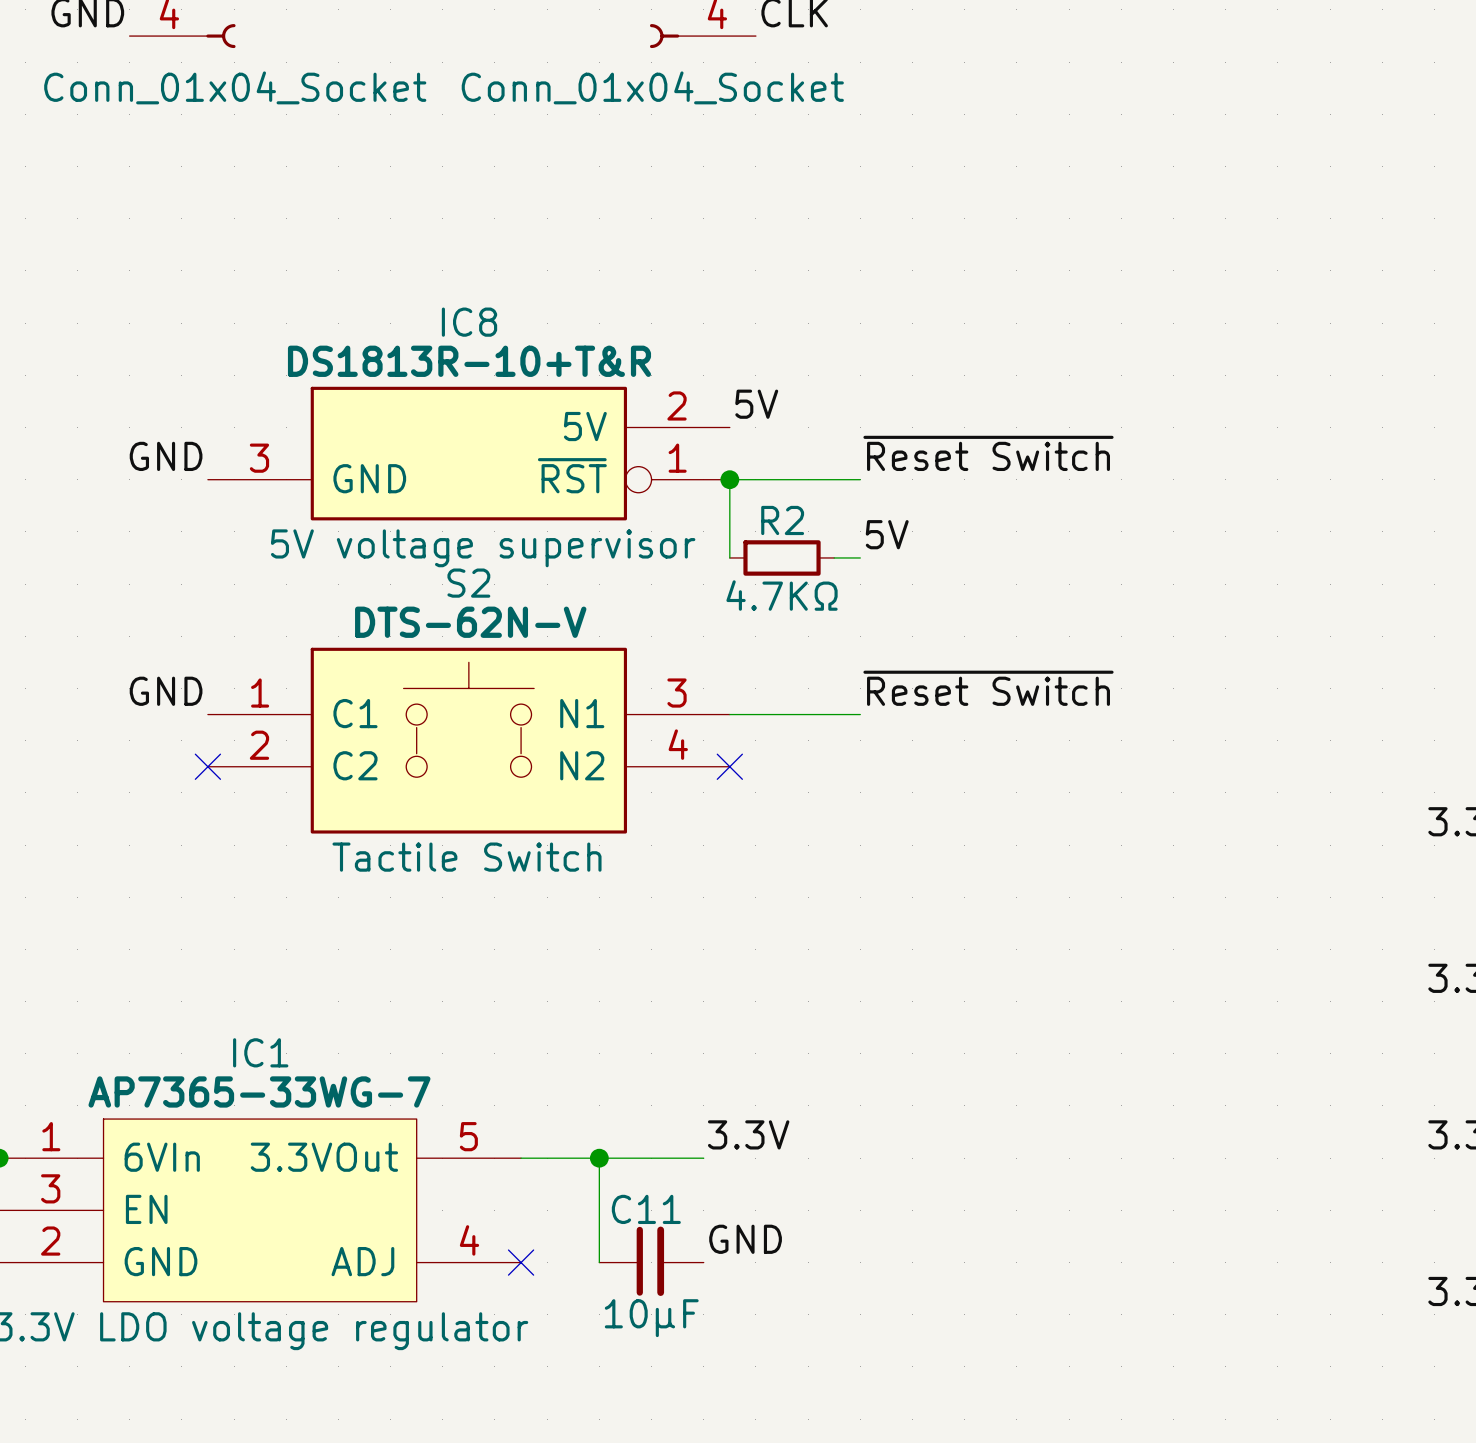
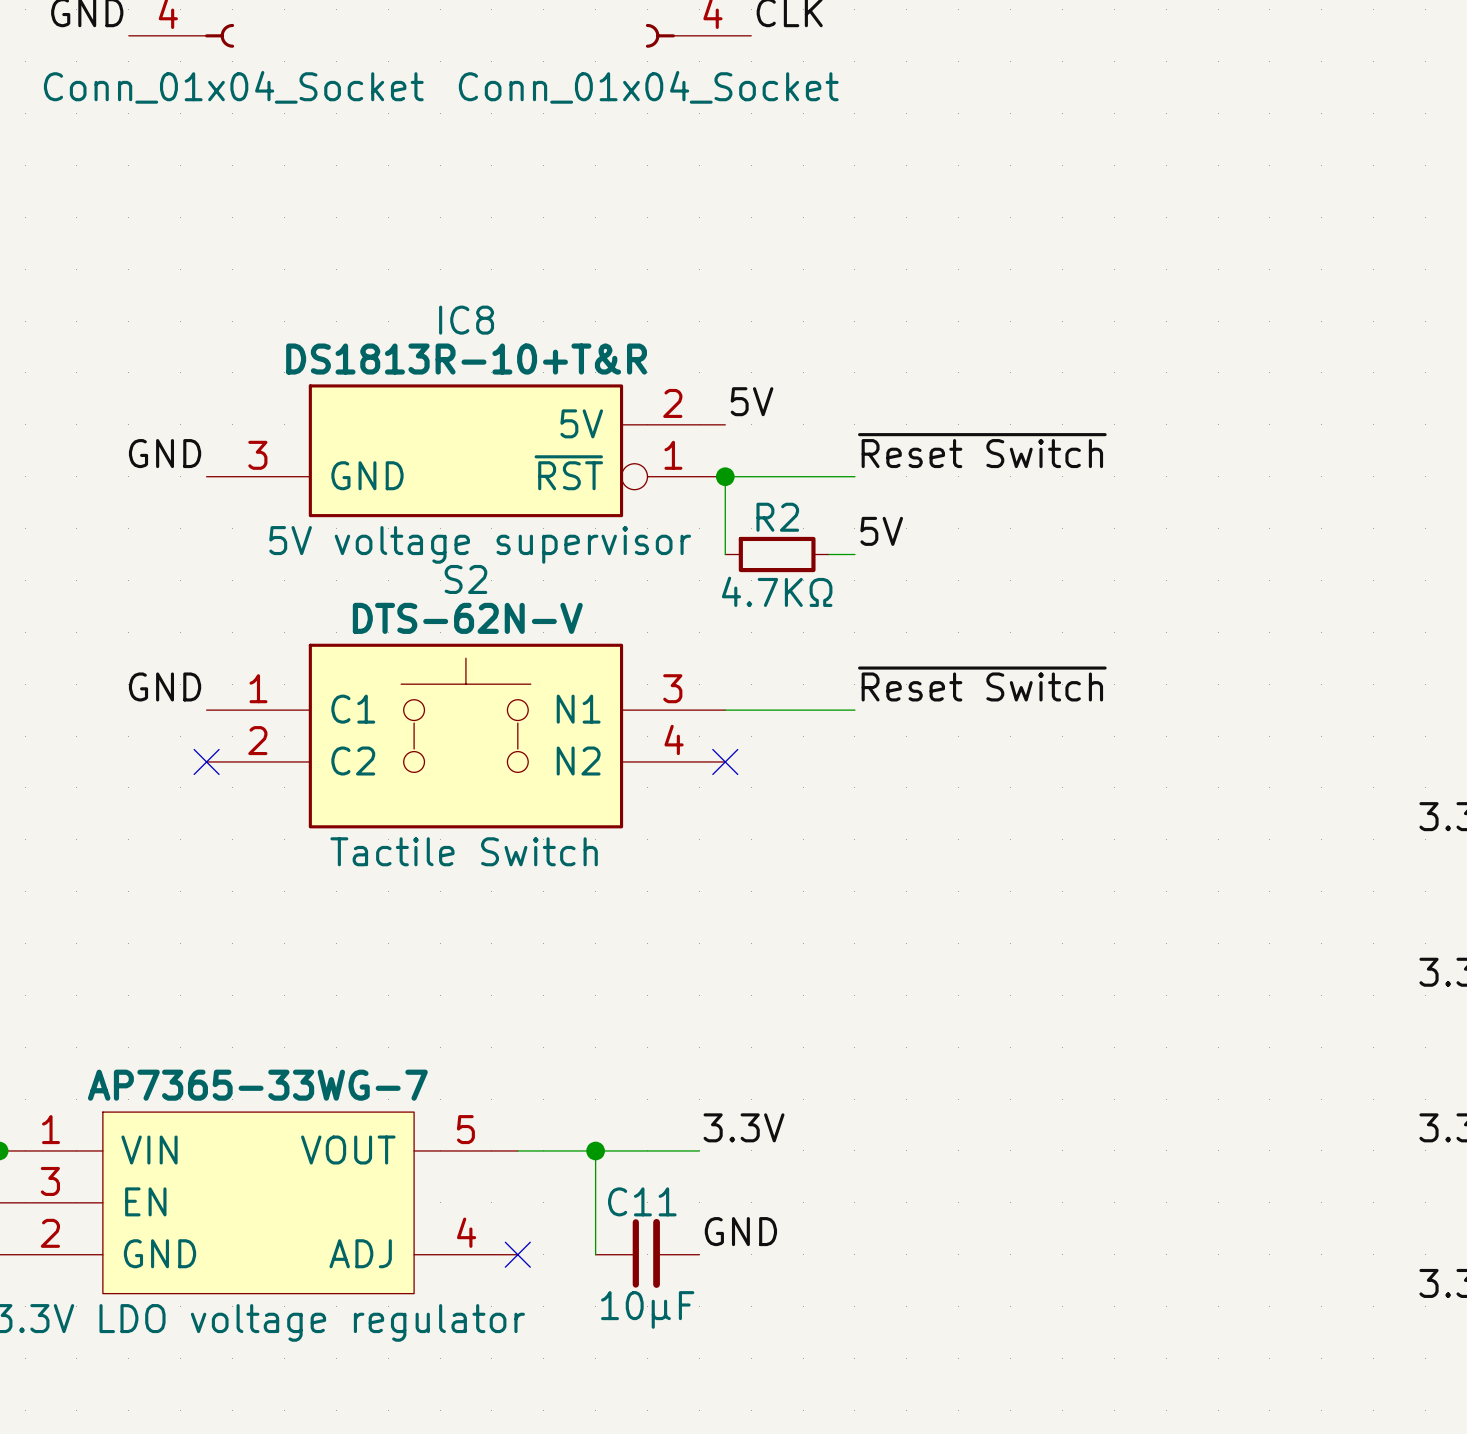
IC1 name: IC1 (260, 1052) -> none
IC1 pin name: 6VIn (162, 1157) -> VIN (149, 1150)
IC1 pin name: 3.3VOut (324, 1157) -> VOUT (348, 1150)

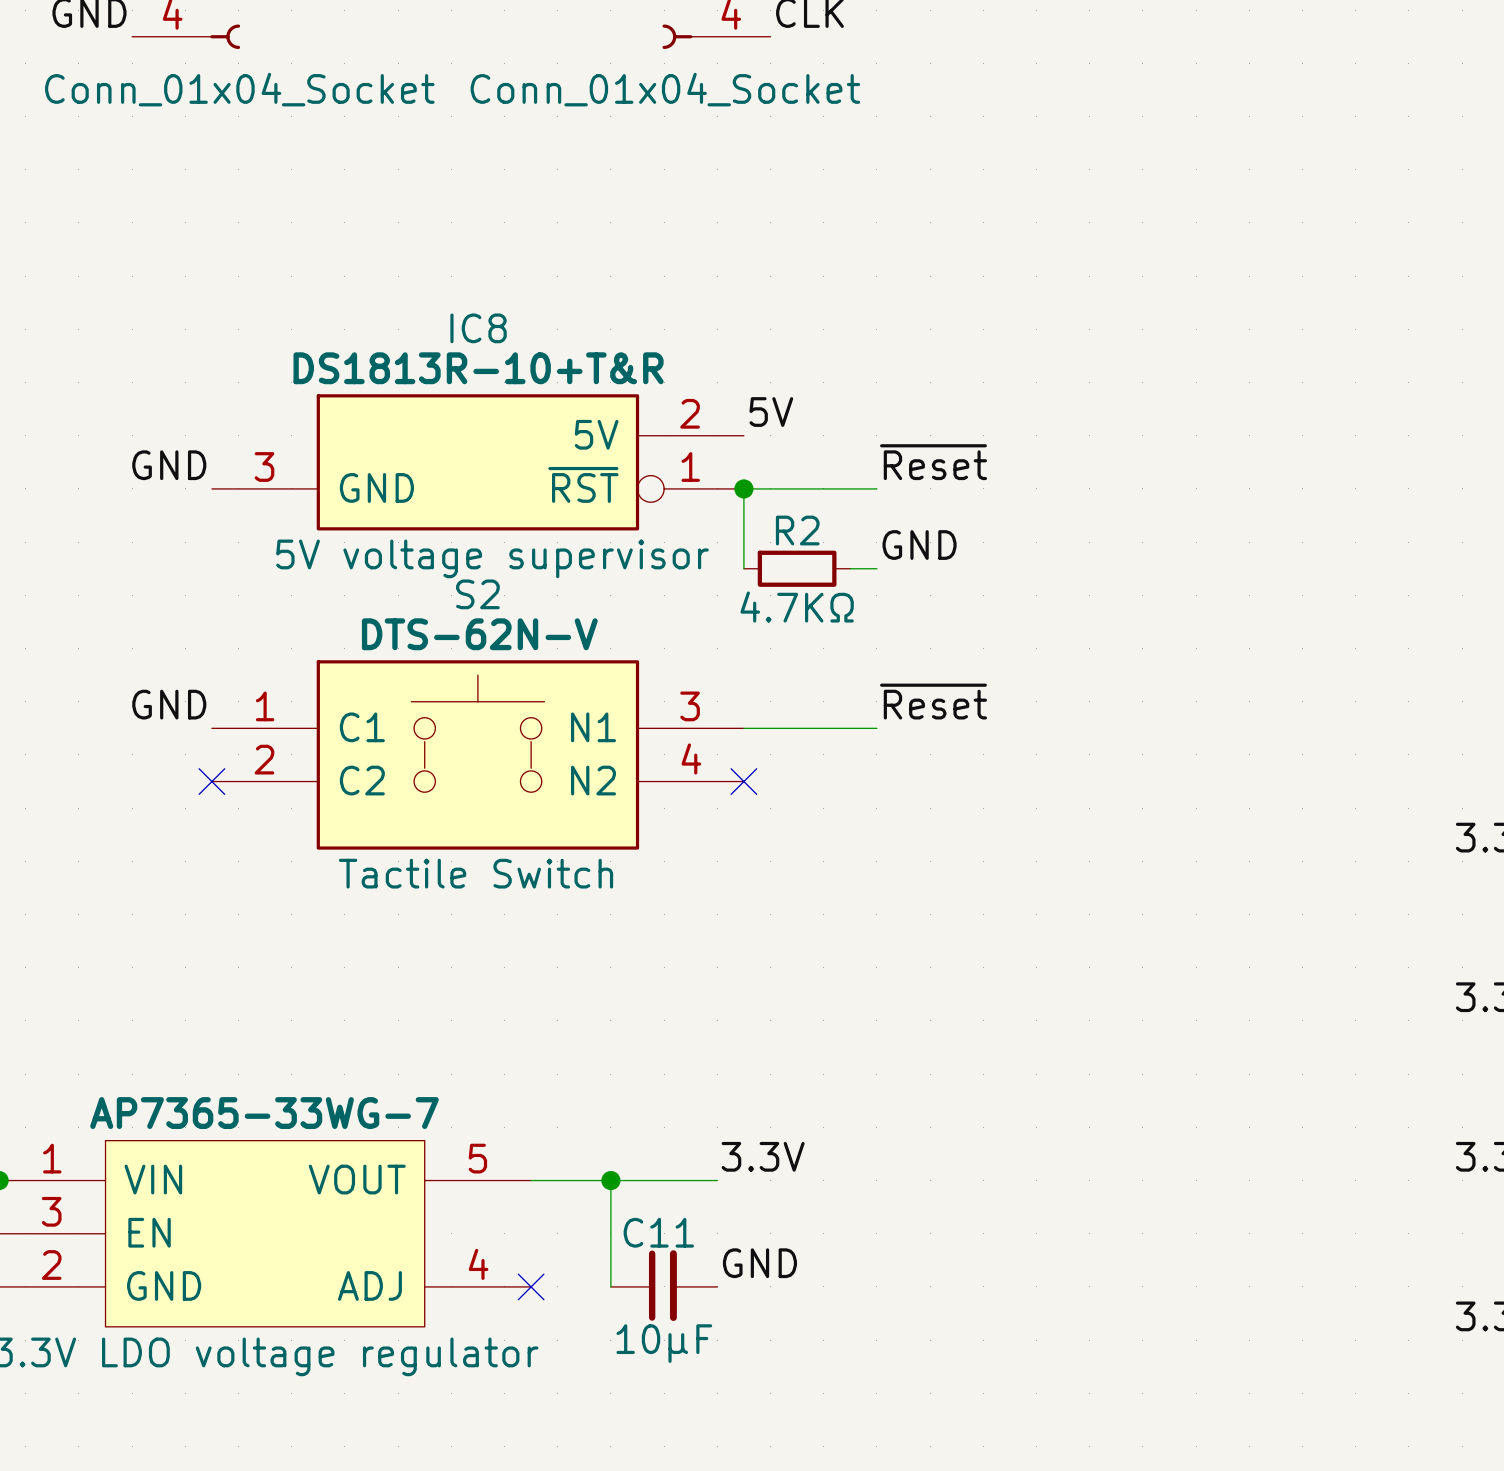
label: ~{Reset Switch} (982, 450) -> ~{Reset} (933, 462)
label: 5V (881, 531) -> GND (919, 545)
label: ~{Reset Switch} (982, 683) -> ~{Reset} (933, 701)

